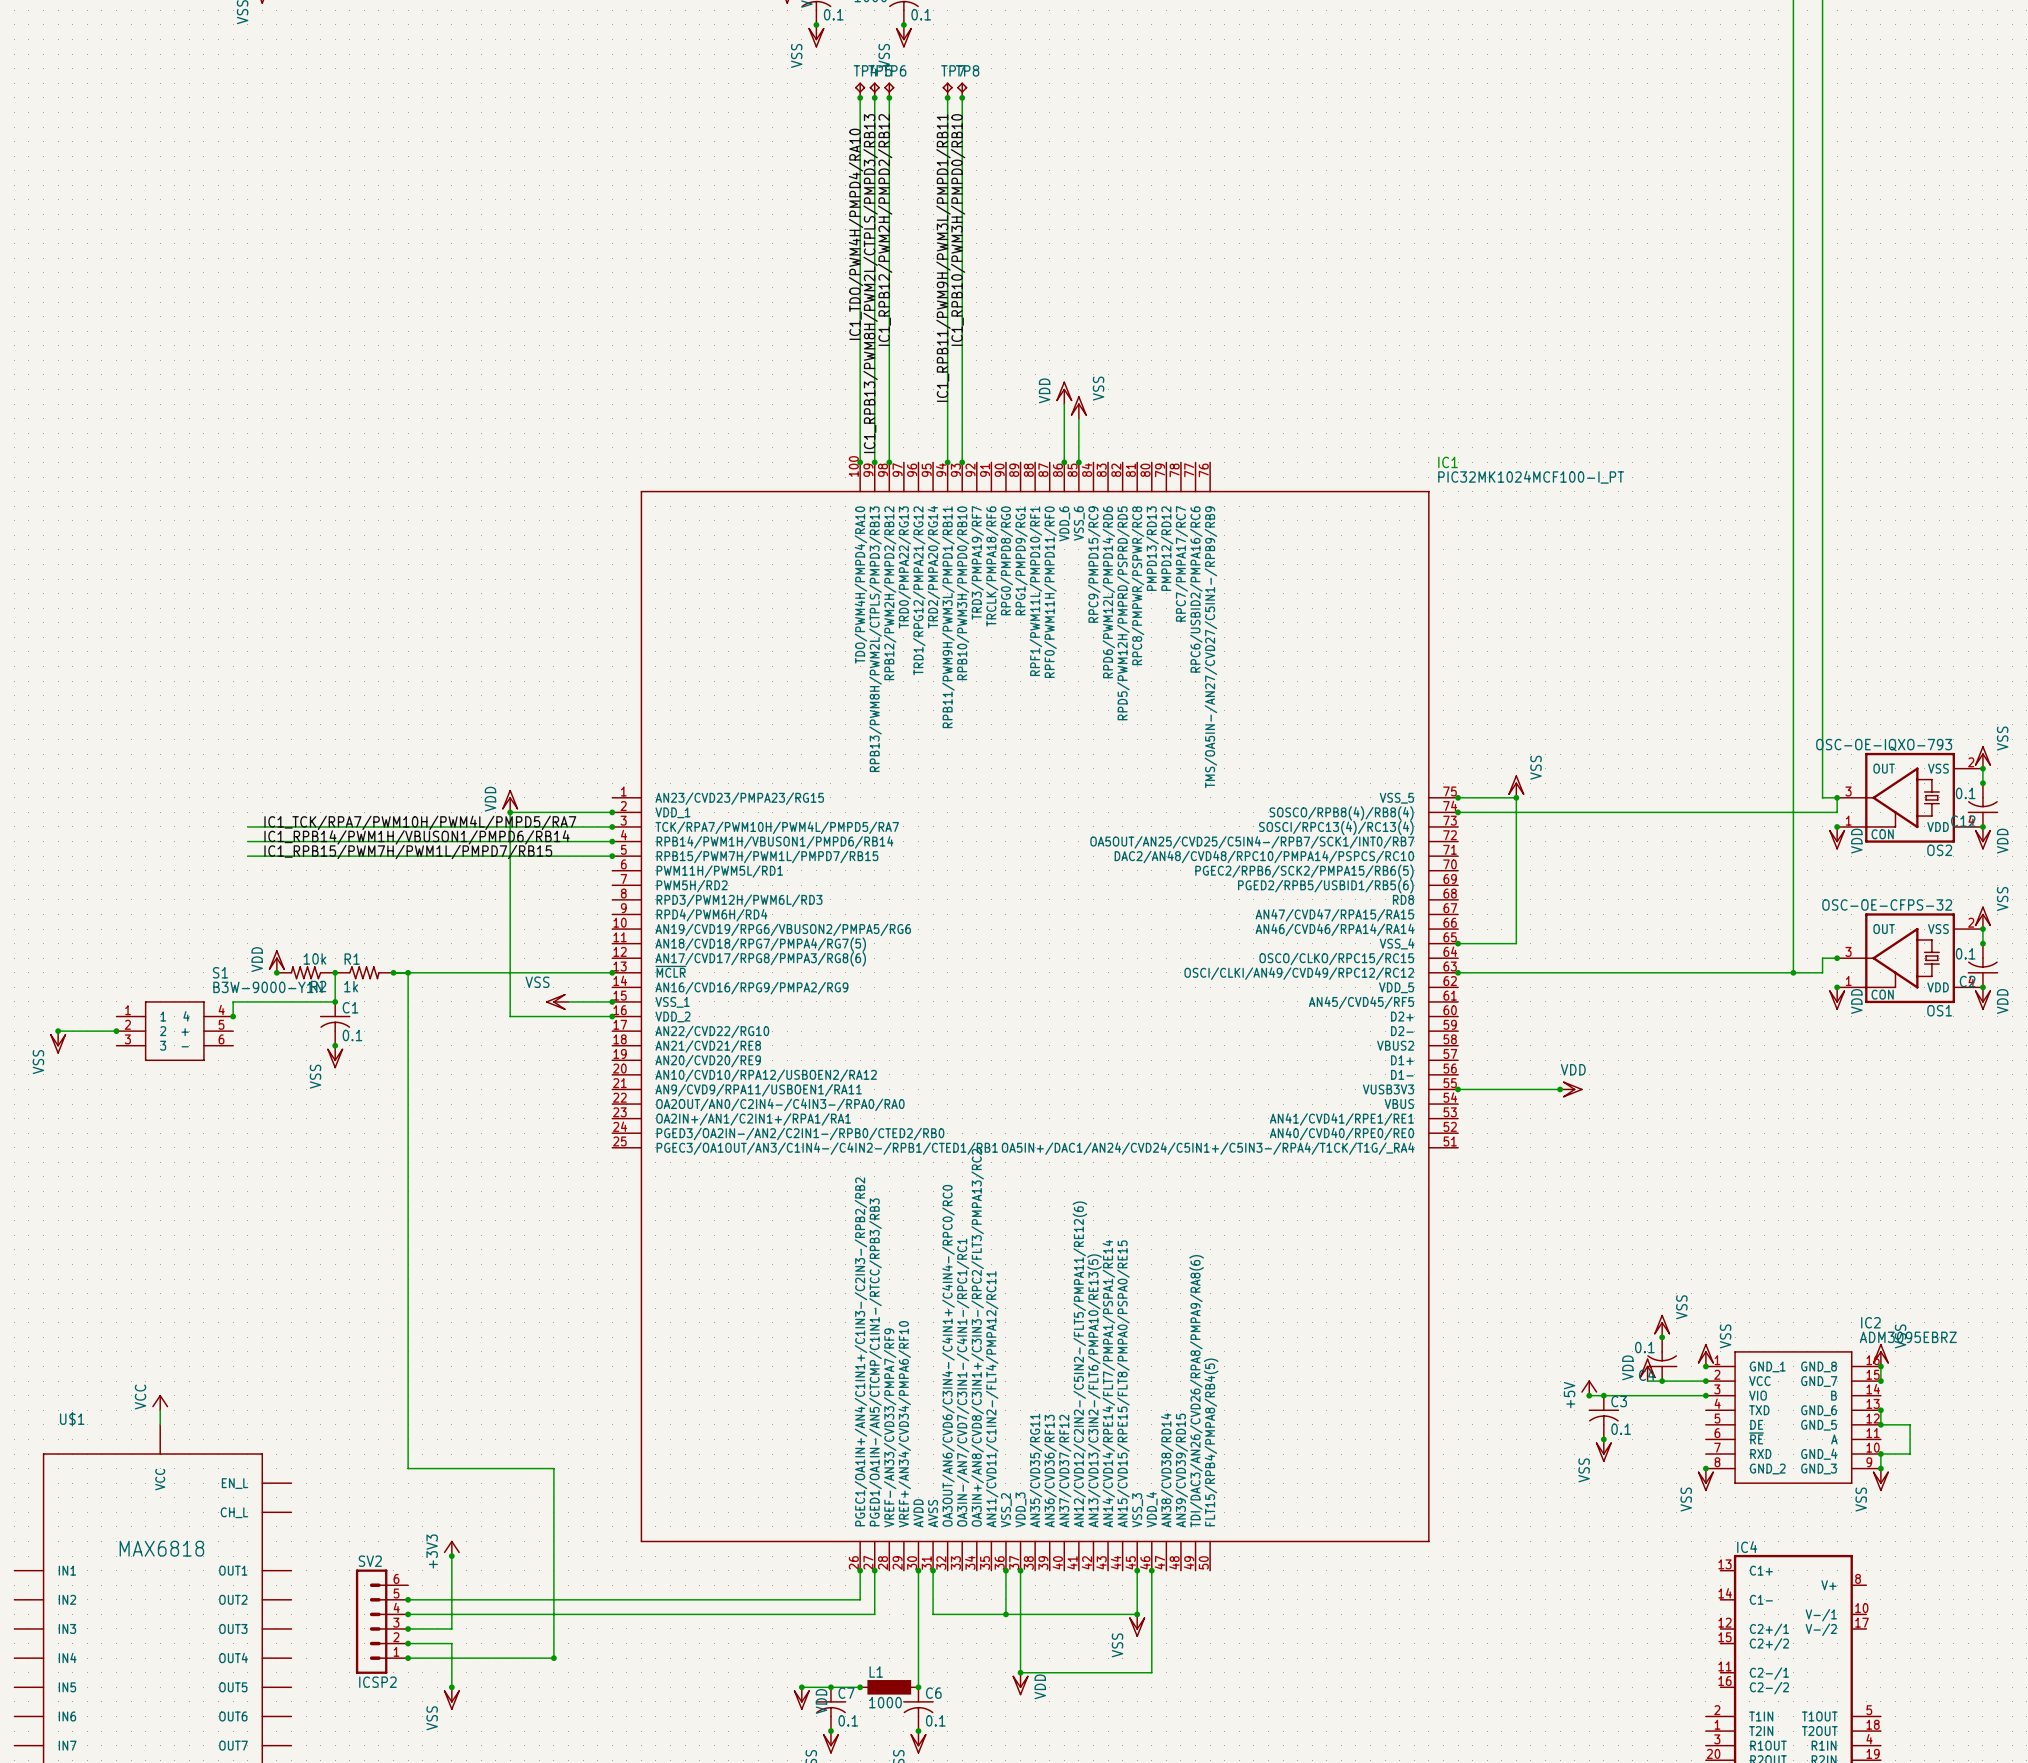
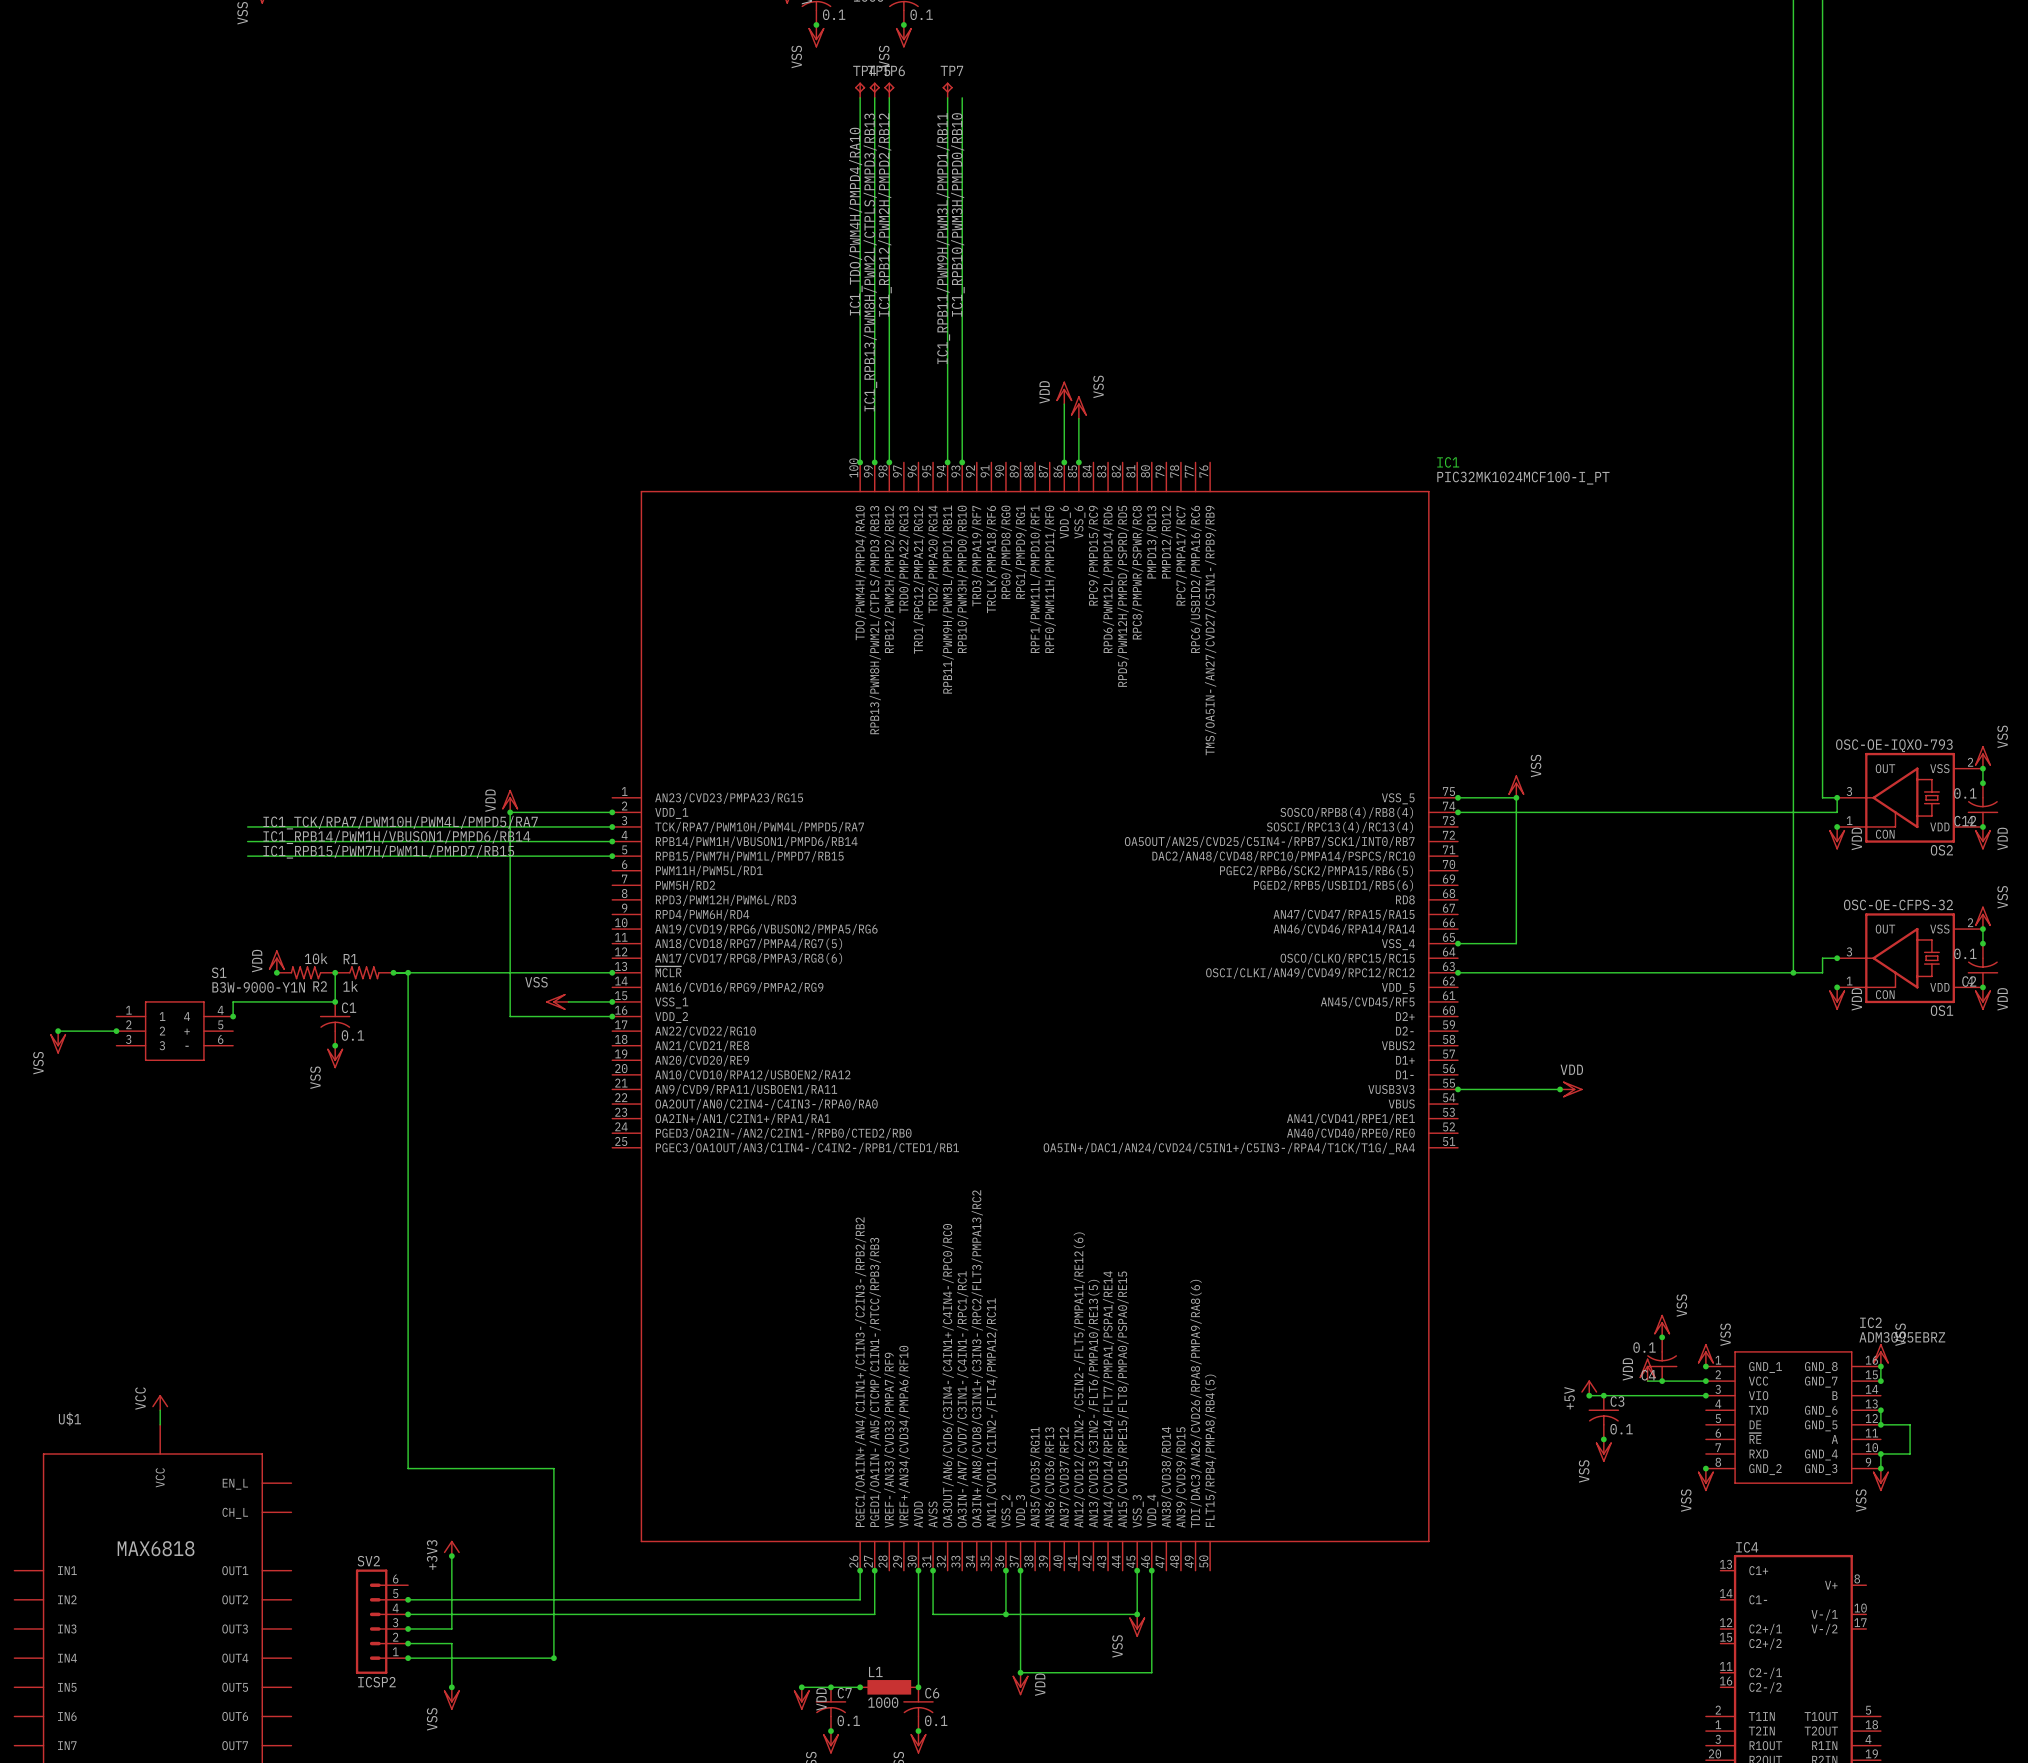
TP8: (962, 90) -> none
junction: (860, 97) -> none
junction: (874, 97) -> none
junction: (889, 97) -> none
junction: (947, 97) -> none
junction: (962, 97) -> none

